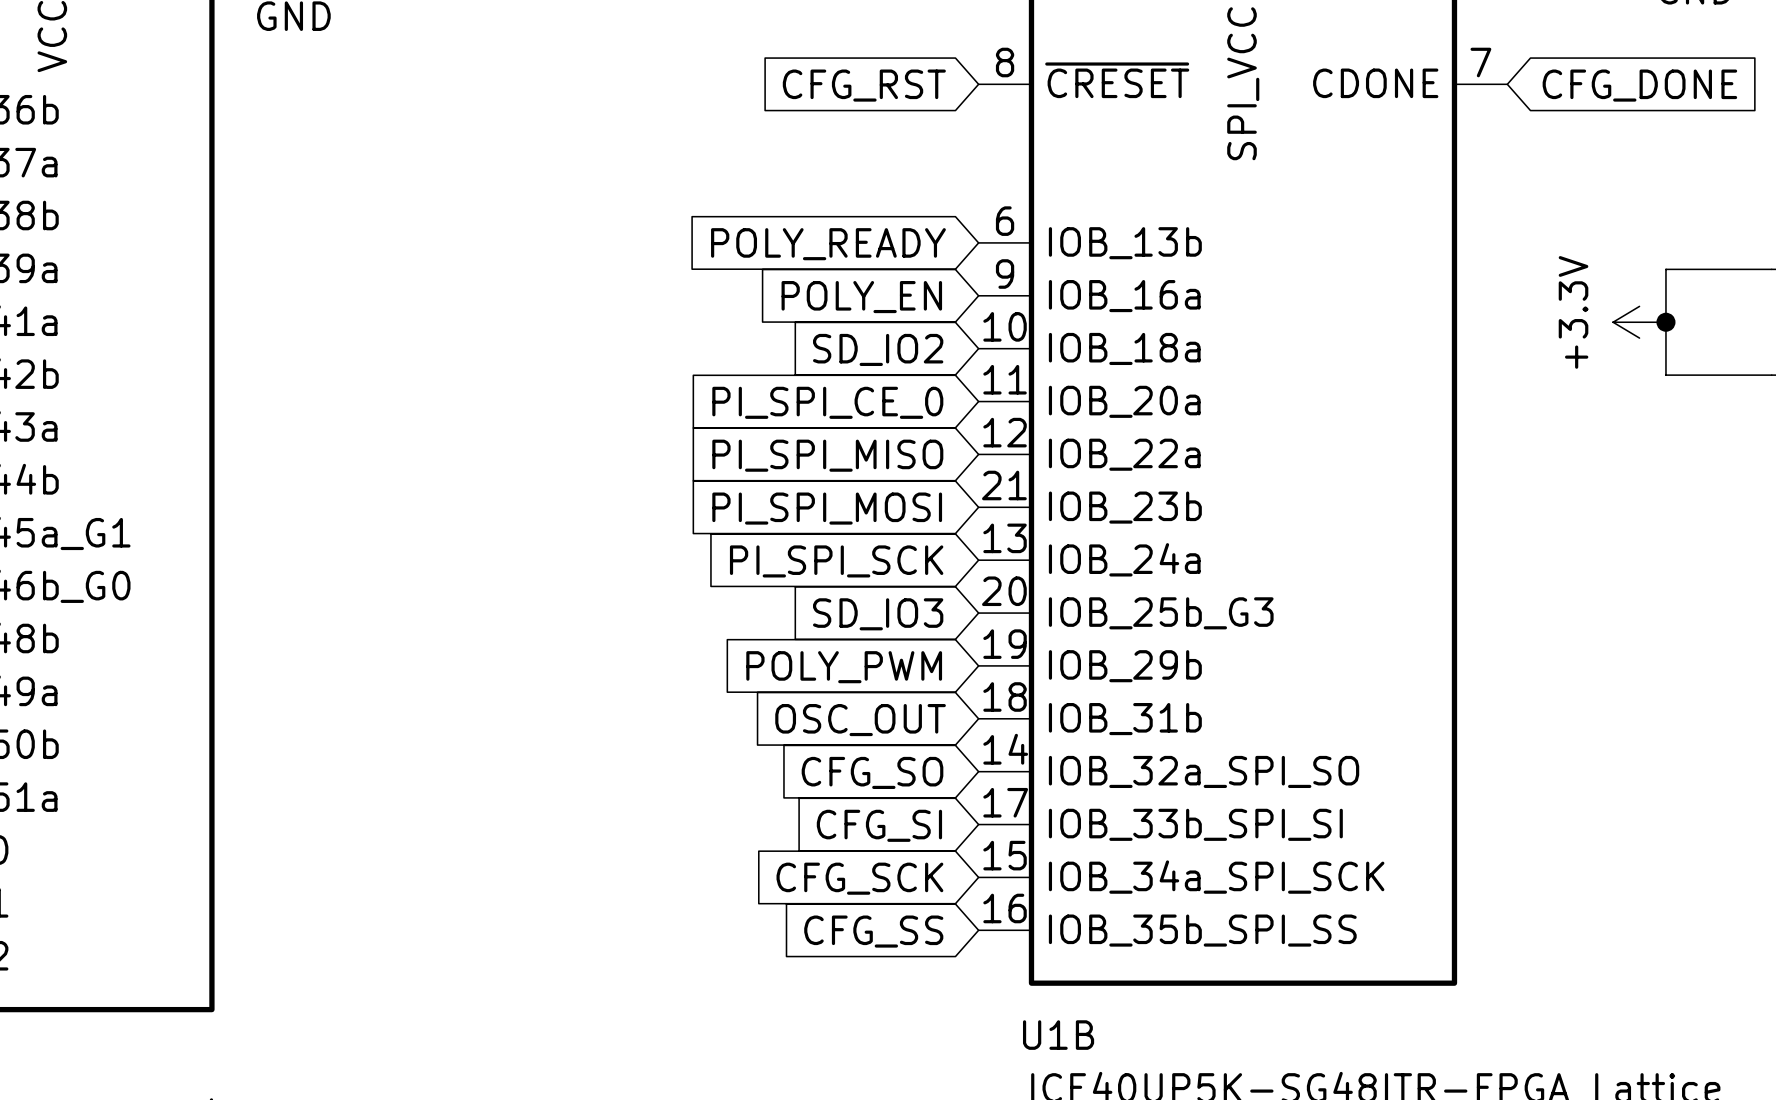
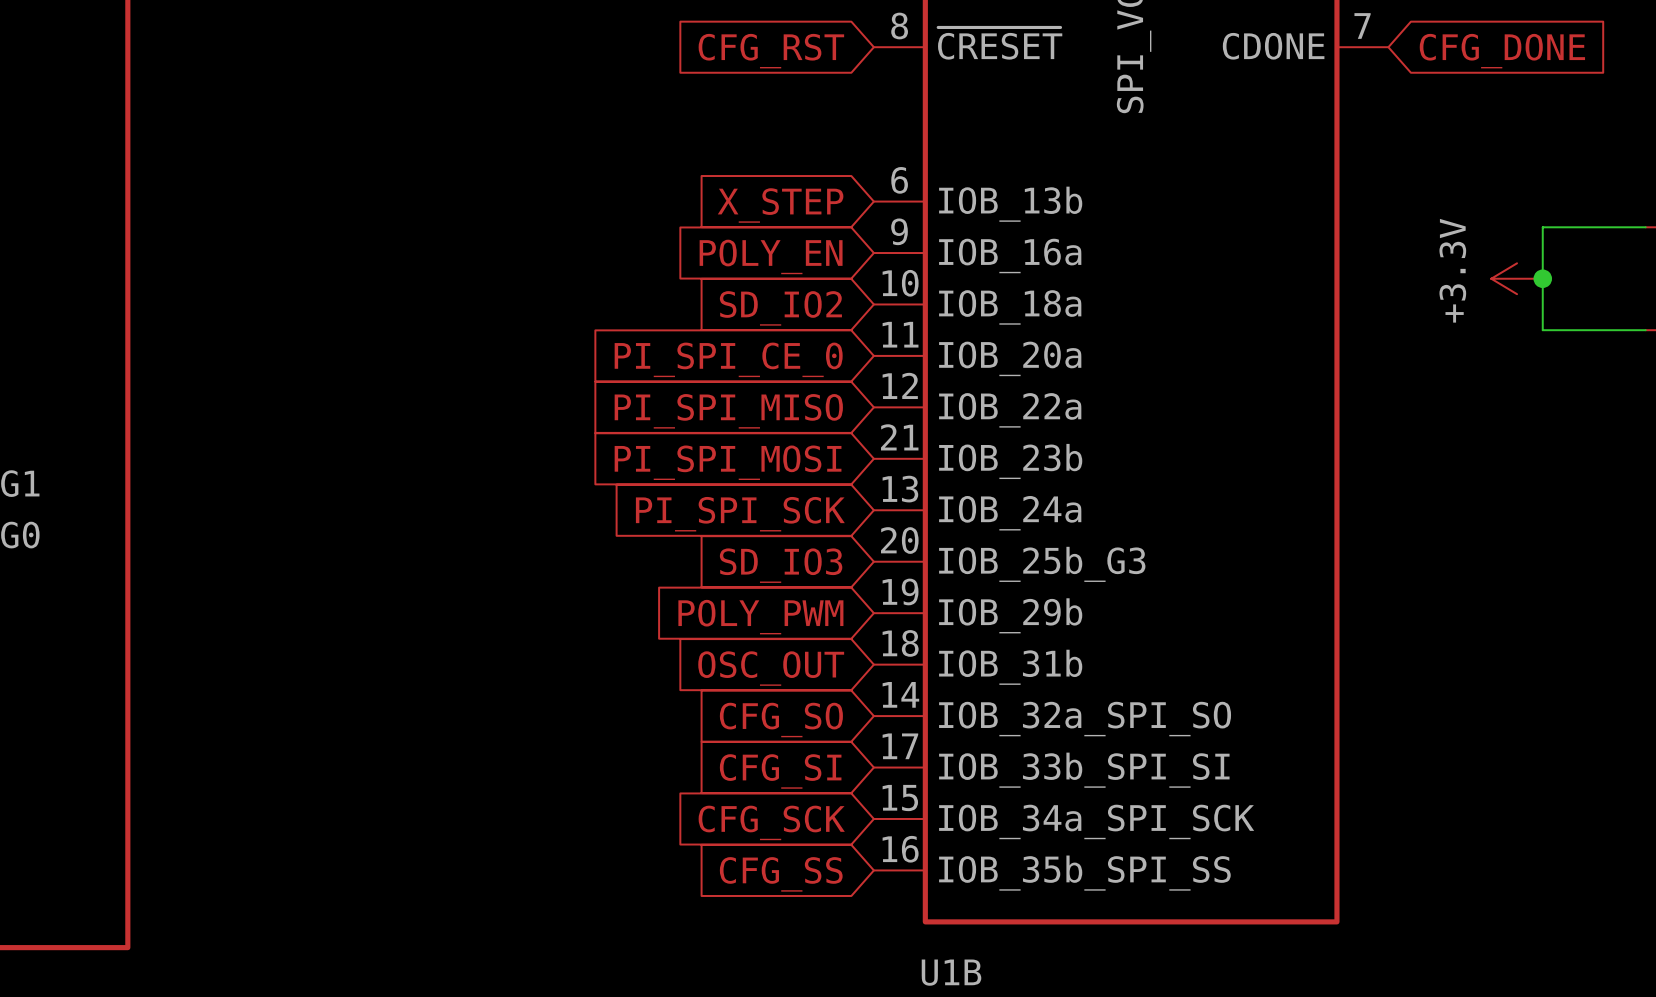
global label: POLY_READY (828, 244) -> X_STEP (780, 205)

